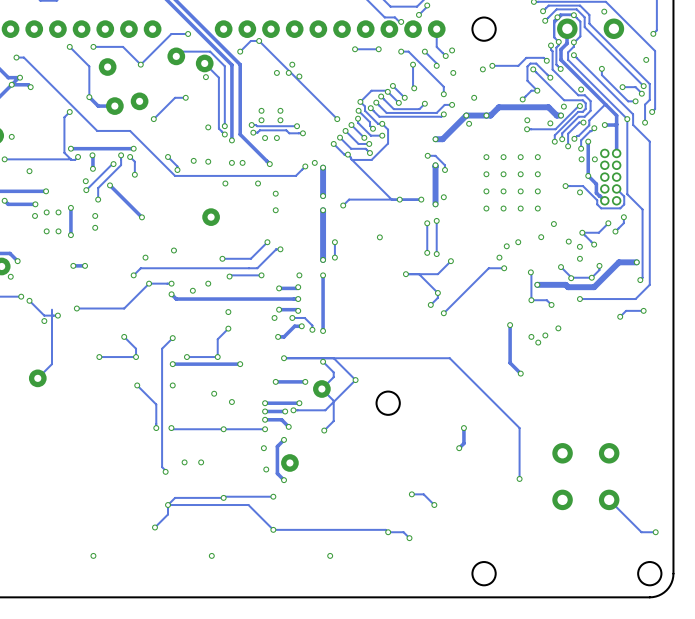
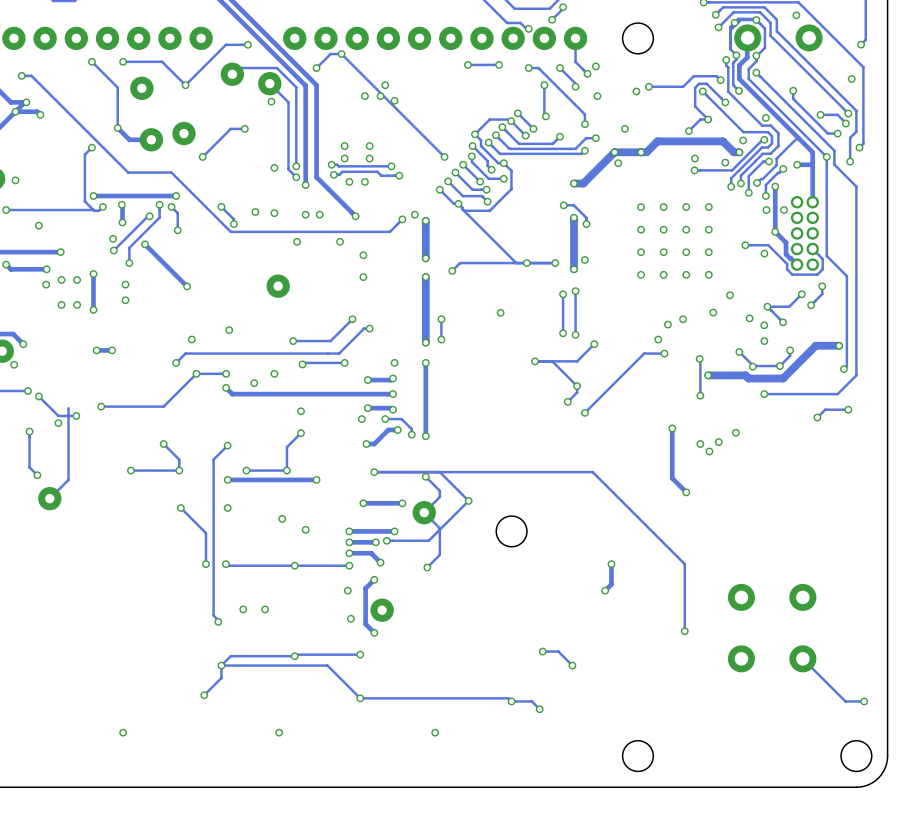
track: (531, 300) (546, 300) (551, 304) -> none
via: (551, 304) -> none
track: none -> (29, 431) (29, 467) (37, 475)
via: none -> (29, 431)
via: none -> (37, 475)

